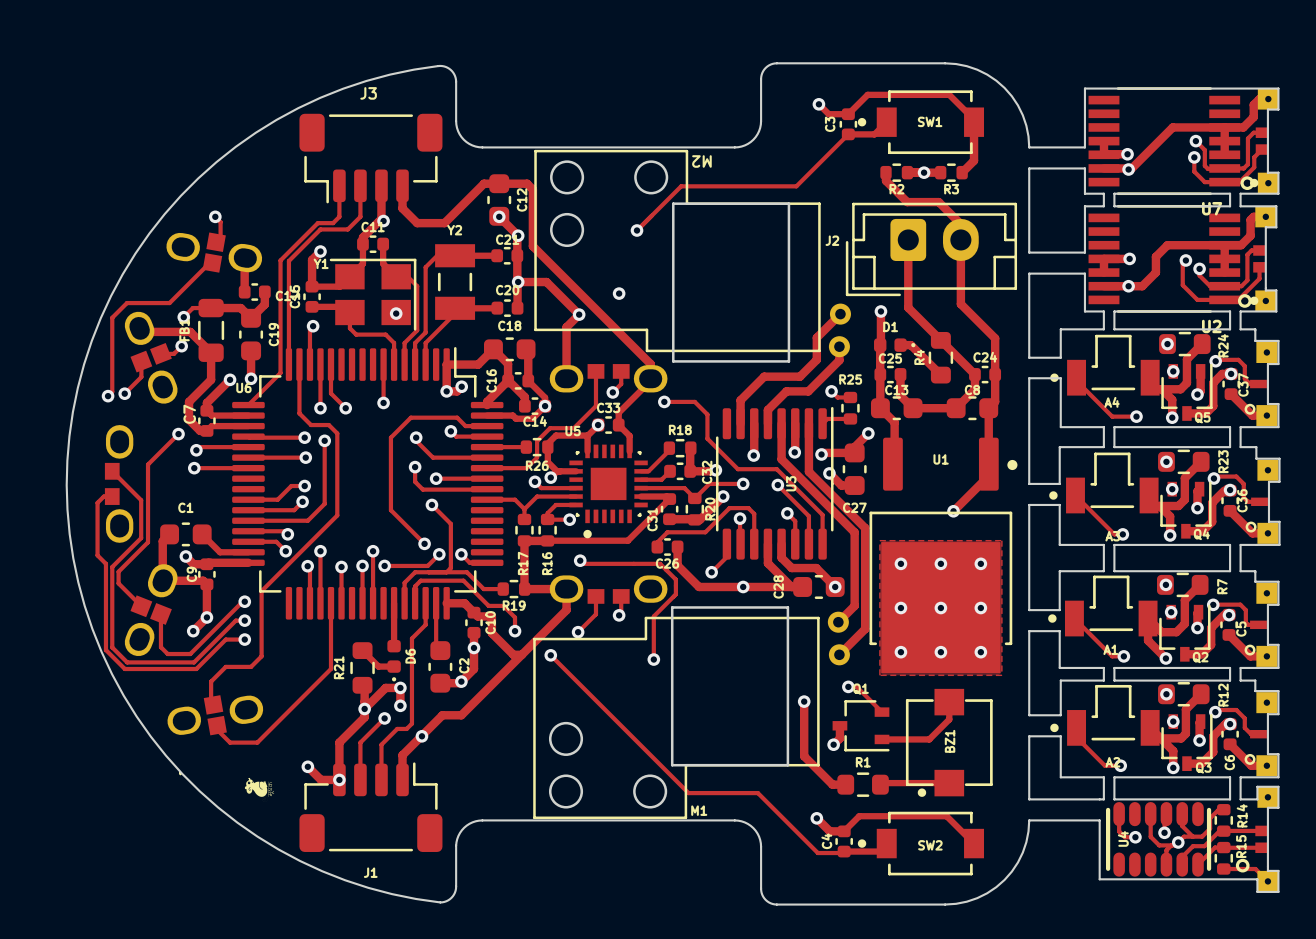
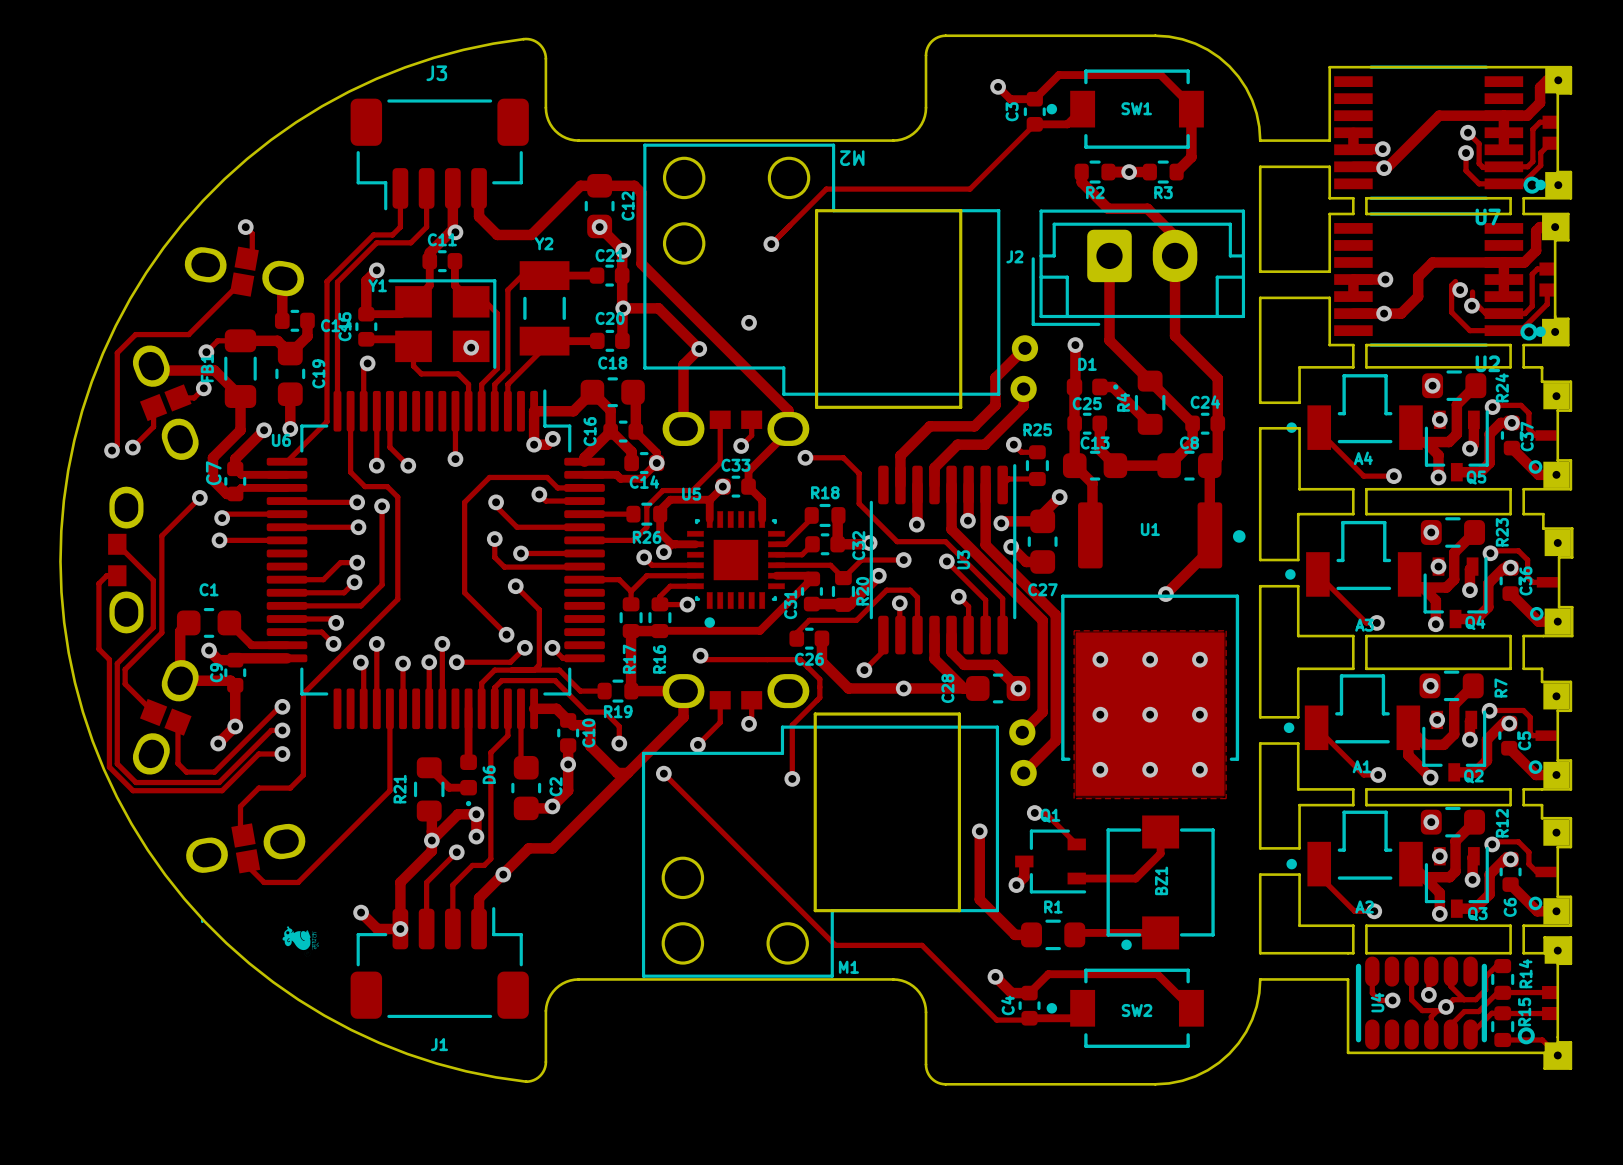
via: (1185, 260) -> none
via: none -> (1460, 290)
via: (1199, 268) -> none
via: none -> (1471, 305)

